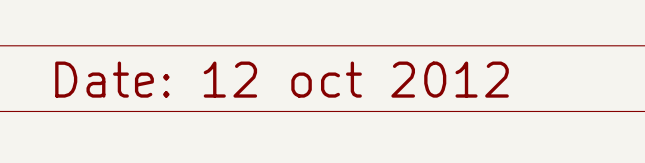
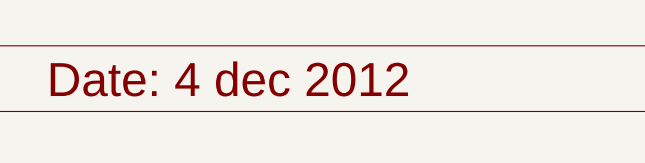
title block: Date: 12 oct 2012 (282, 79) -> Date: 4 dec 2012 (229, 78)

